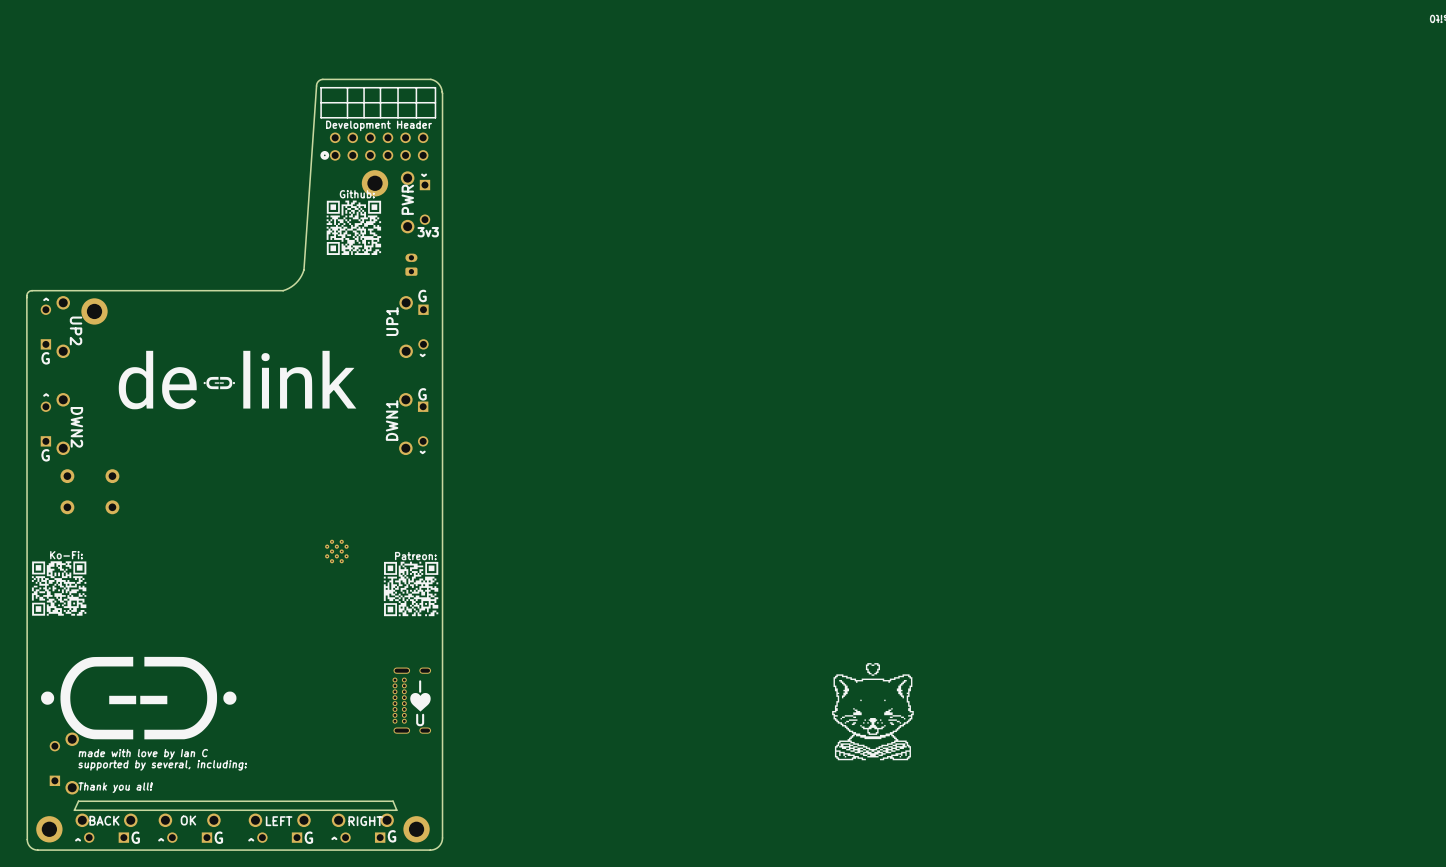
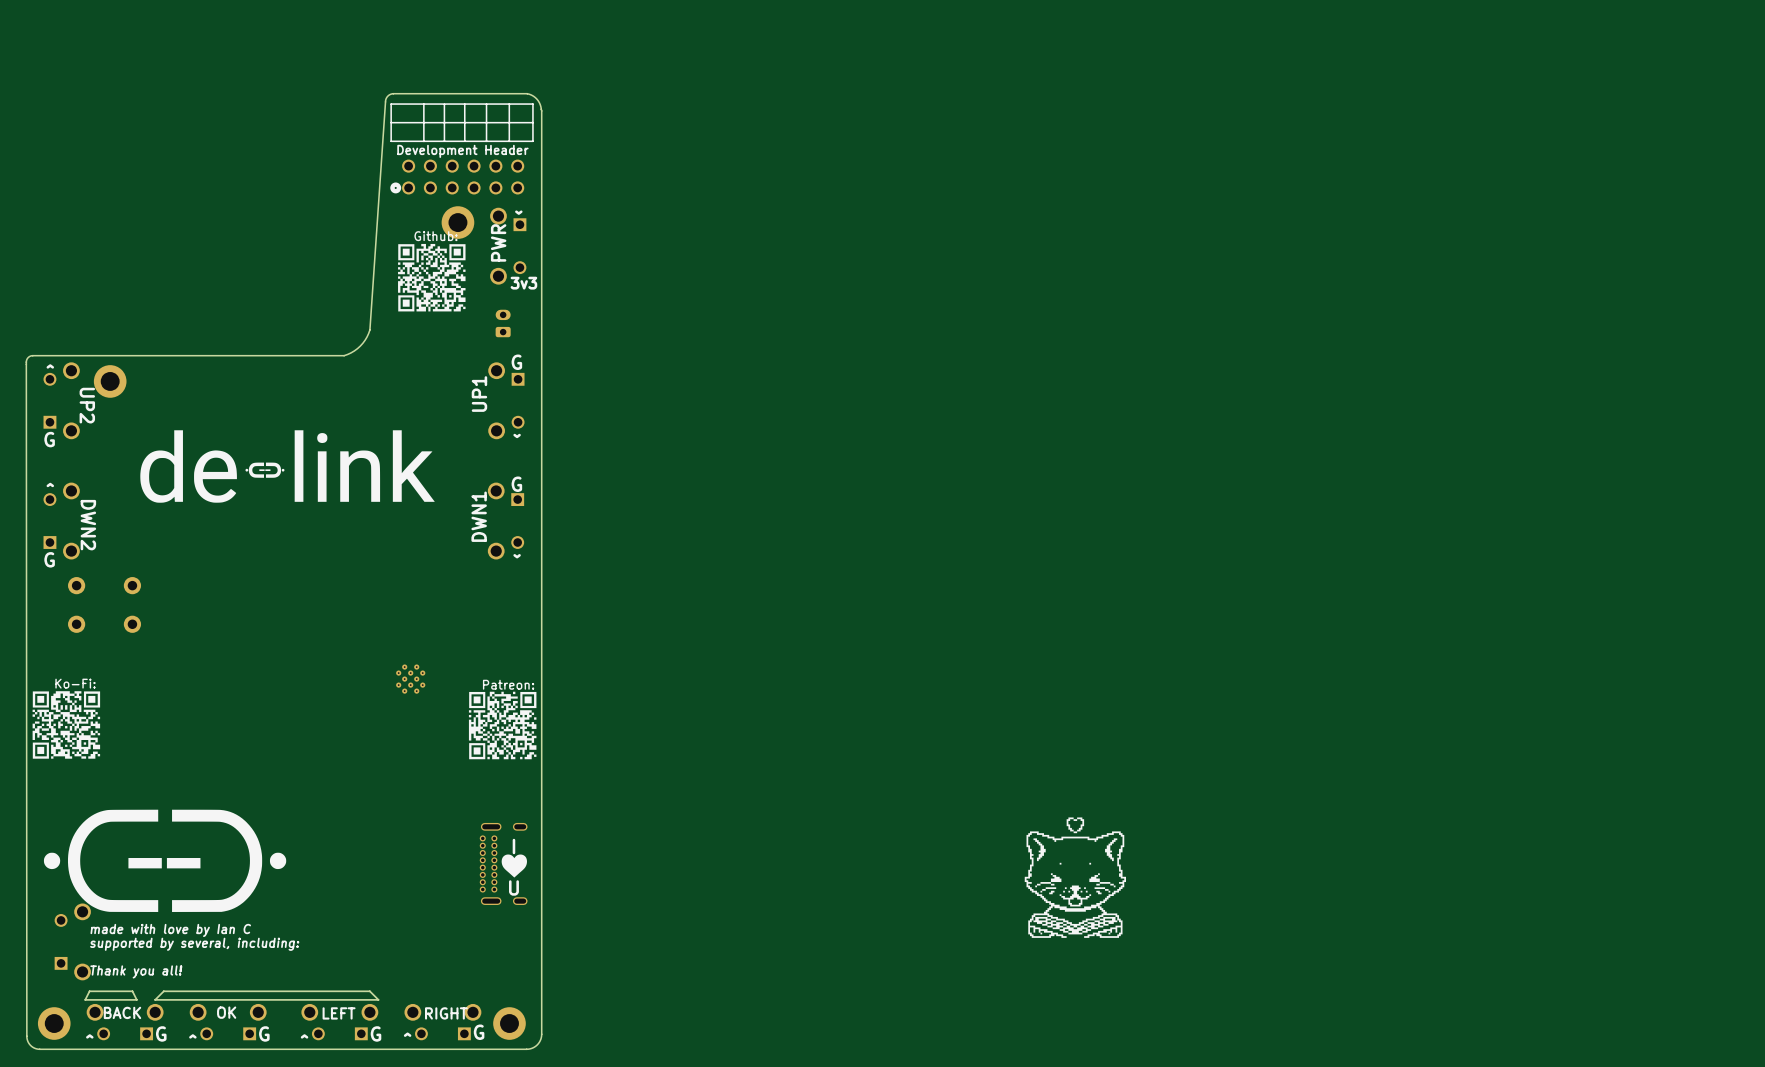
board edge: (74, 810) (78, 801) (393, 801) (396, 810) (310, 810) -> (155, 999) (163, 991) (369, 991) (378, 999)
board edge: (115, 810) (130, 810) -> (136, 999) (132, 991) (89, 991) (85, 999)

